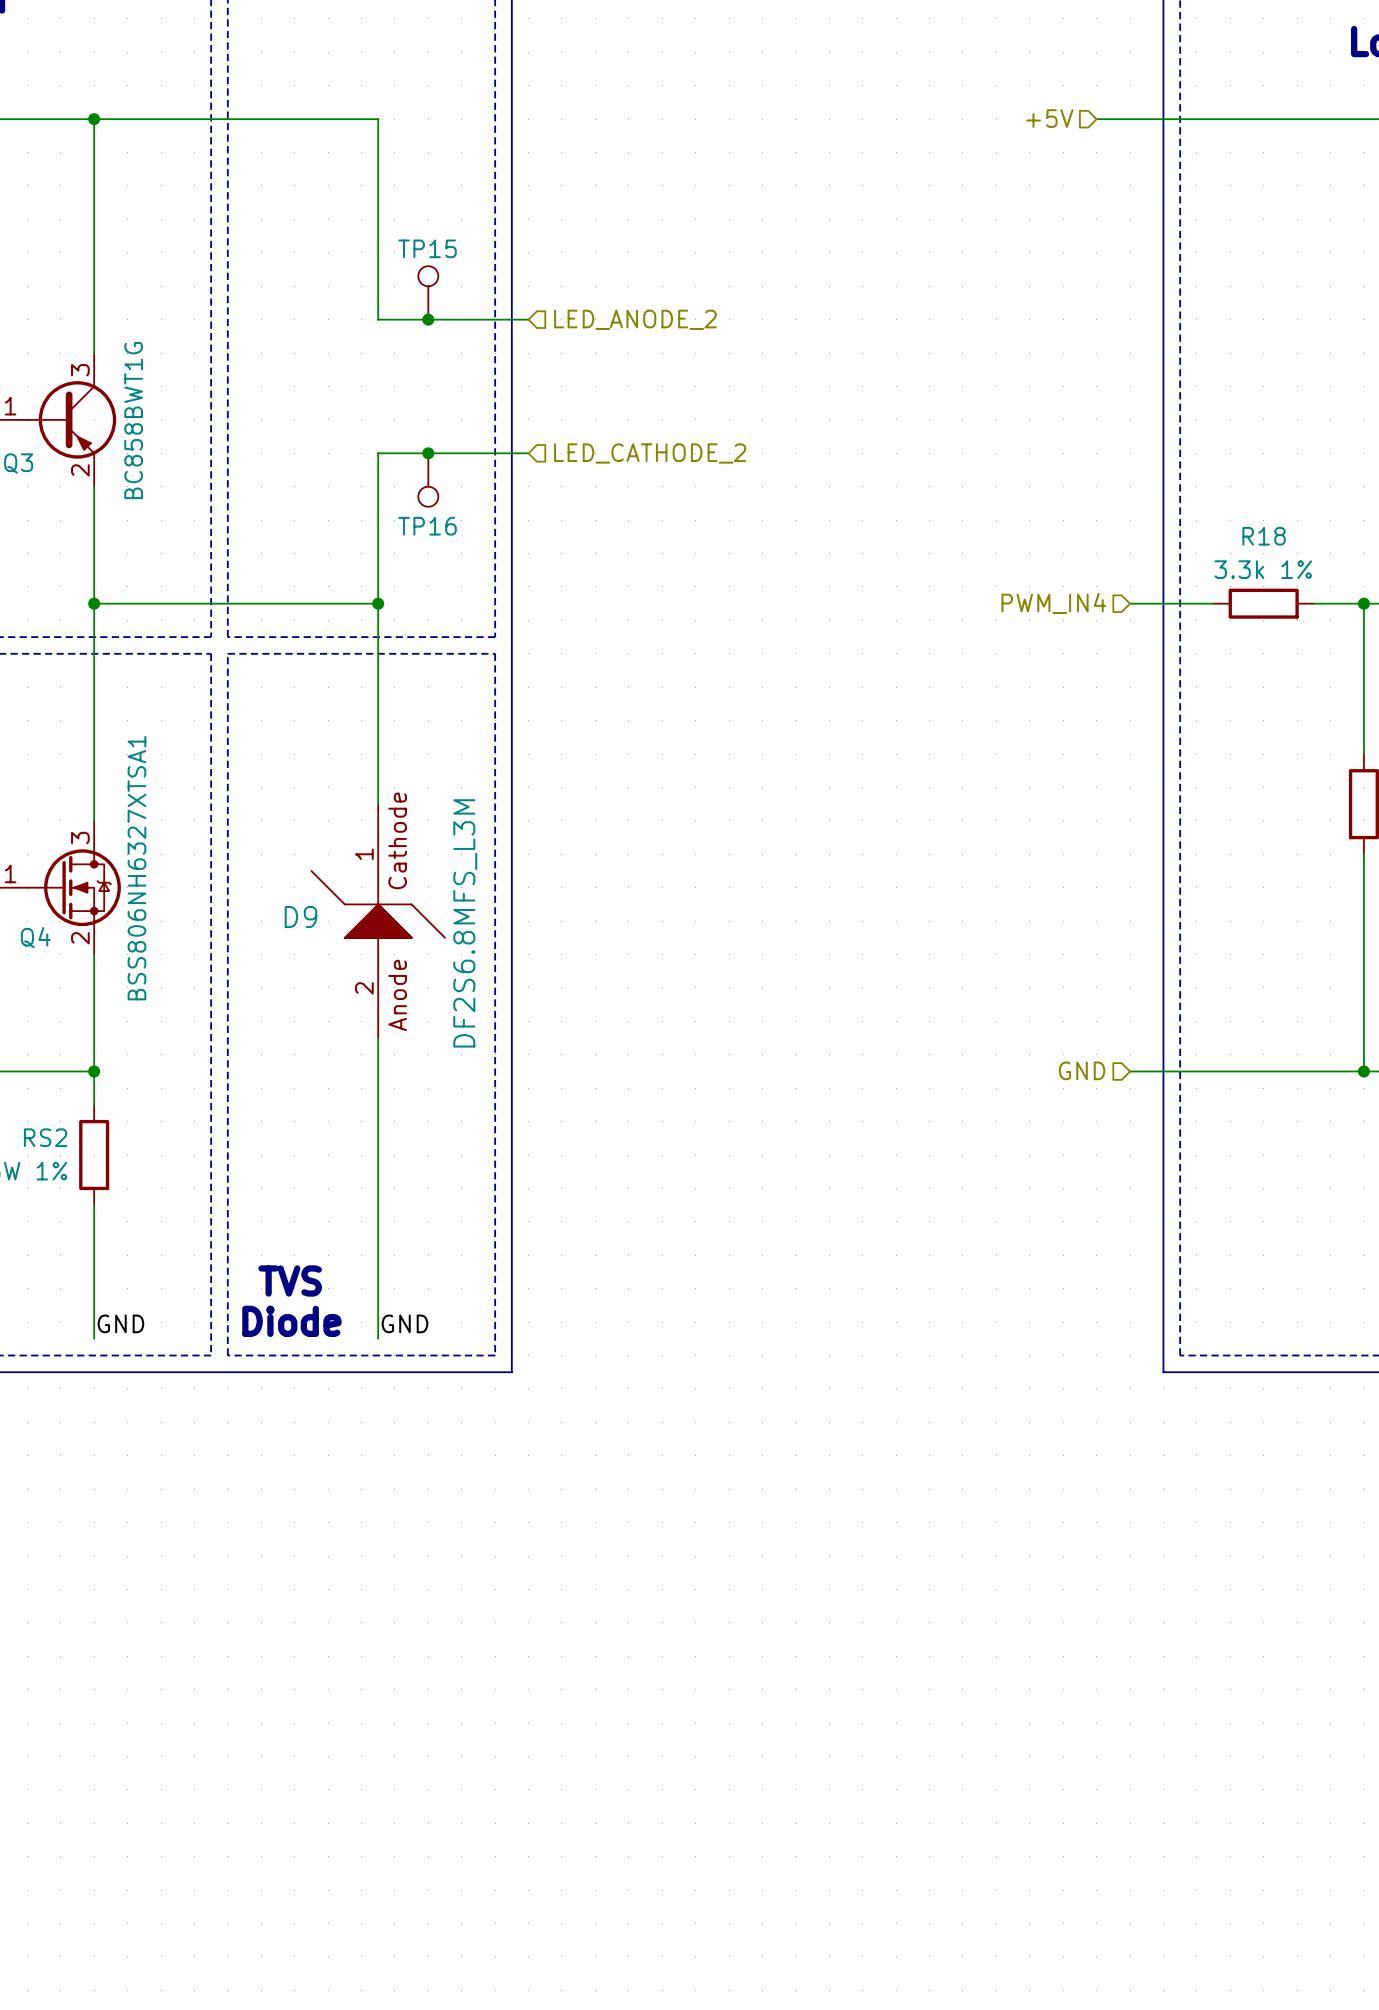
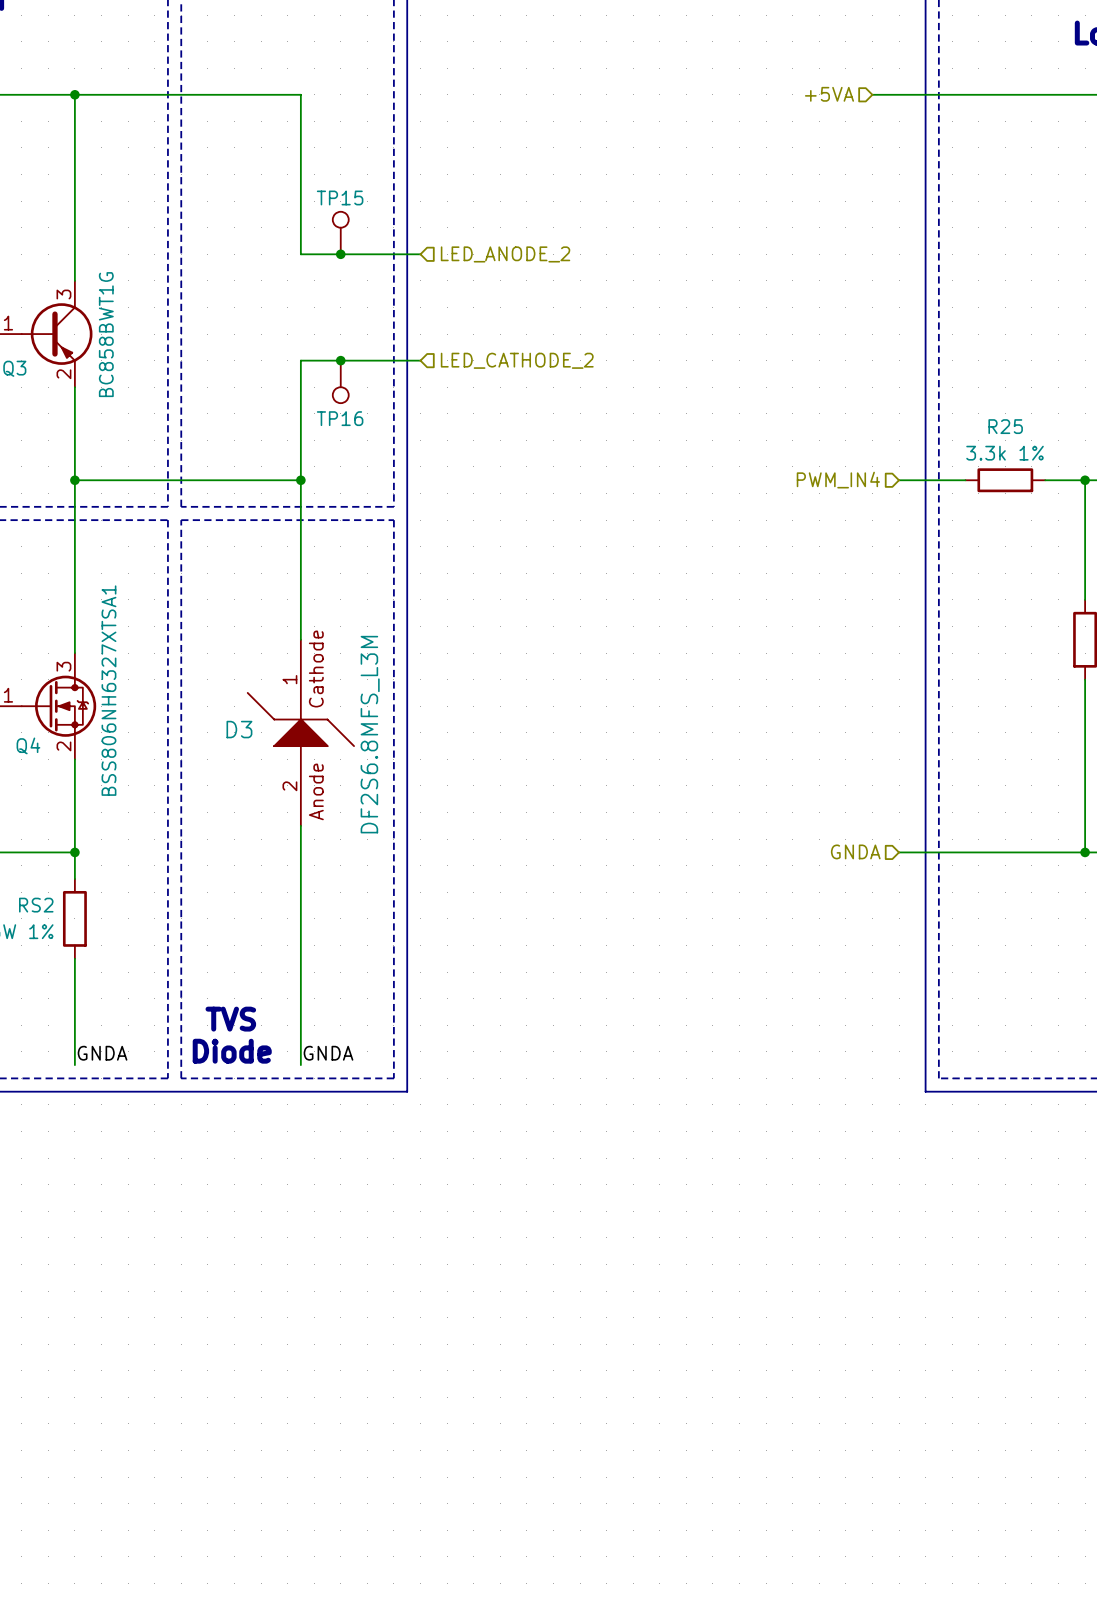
hierarchical label: +5V (1049, 118) -> +5VA (829, 94)
R18 name: R18 (1264, 536) -> R25 (1005, 426)
D9 name: D9 (300, 917) -> D3 (239, 729)
hierarchical label: GND (1082, 1070) -> GNDA (855, 851)
label: GND (120, 1323) -> GNDA (102, 1053)
label: GND (404, 1323) -> GNDA (328, 1053)

